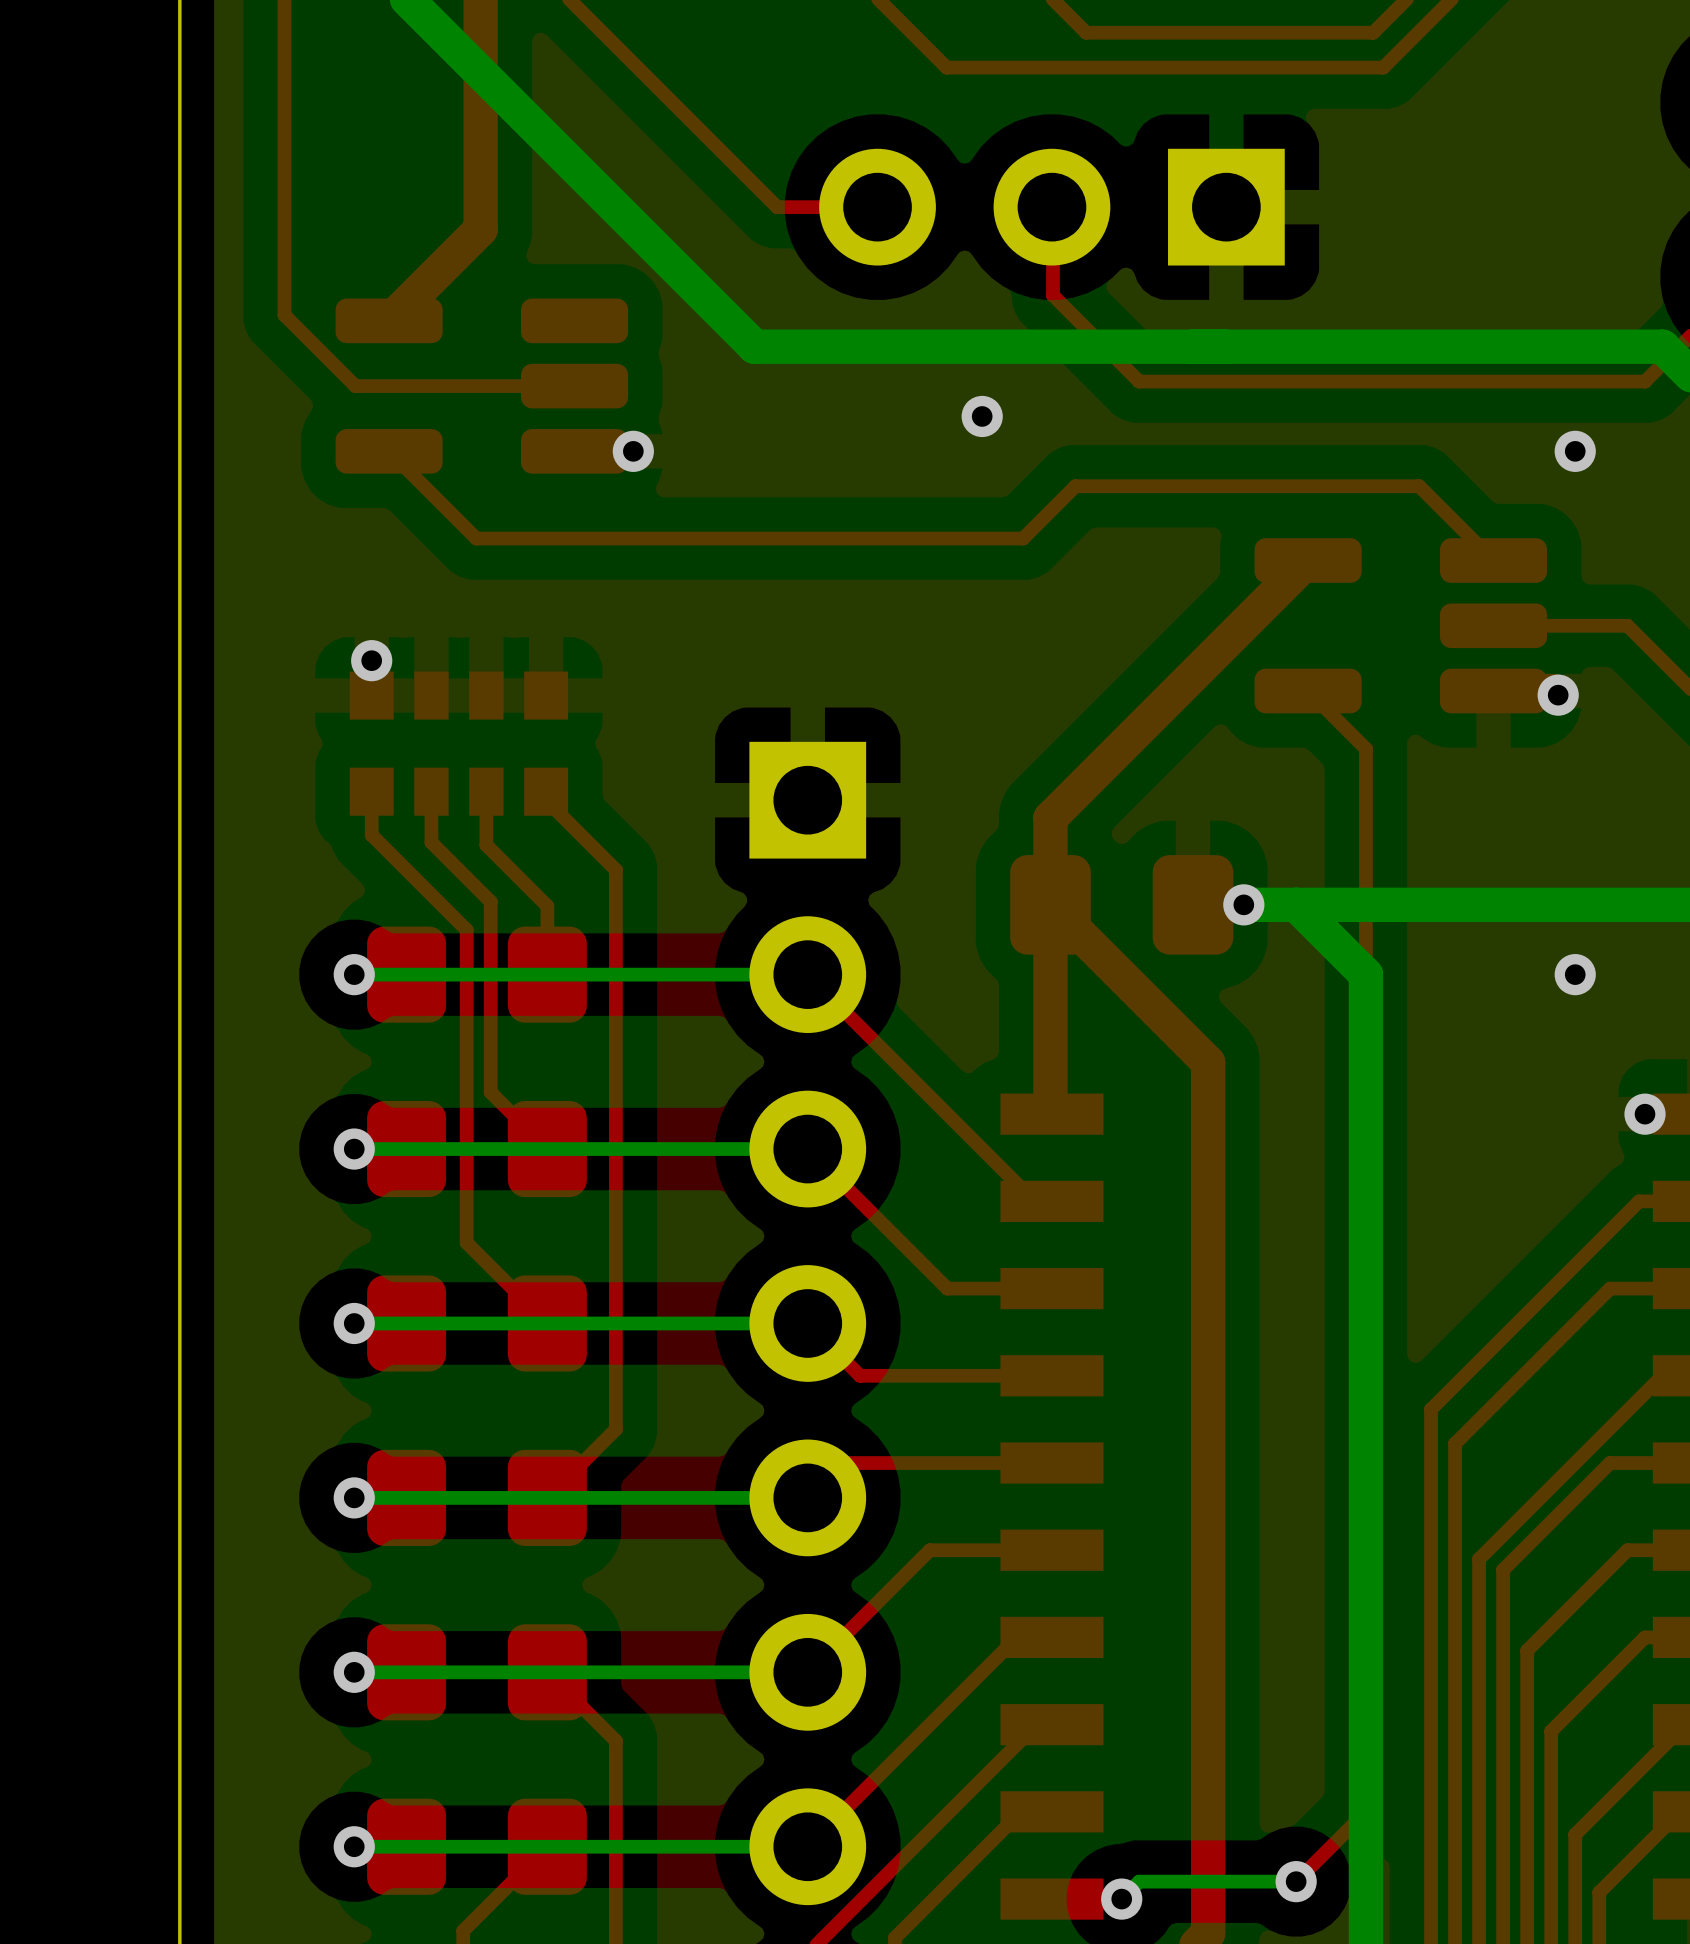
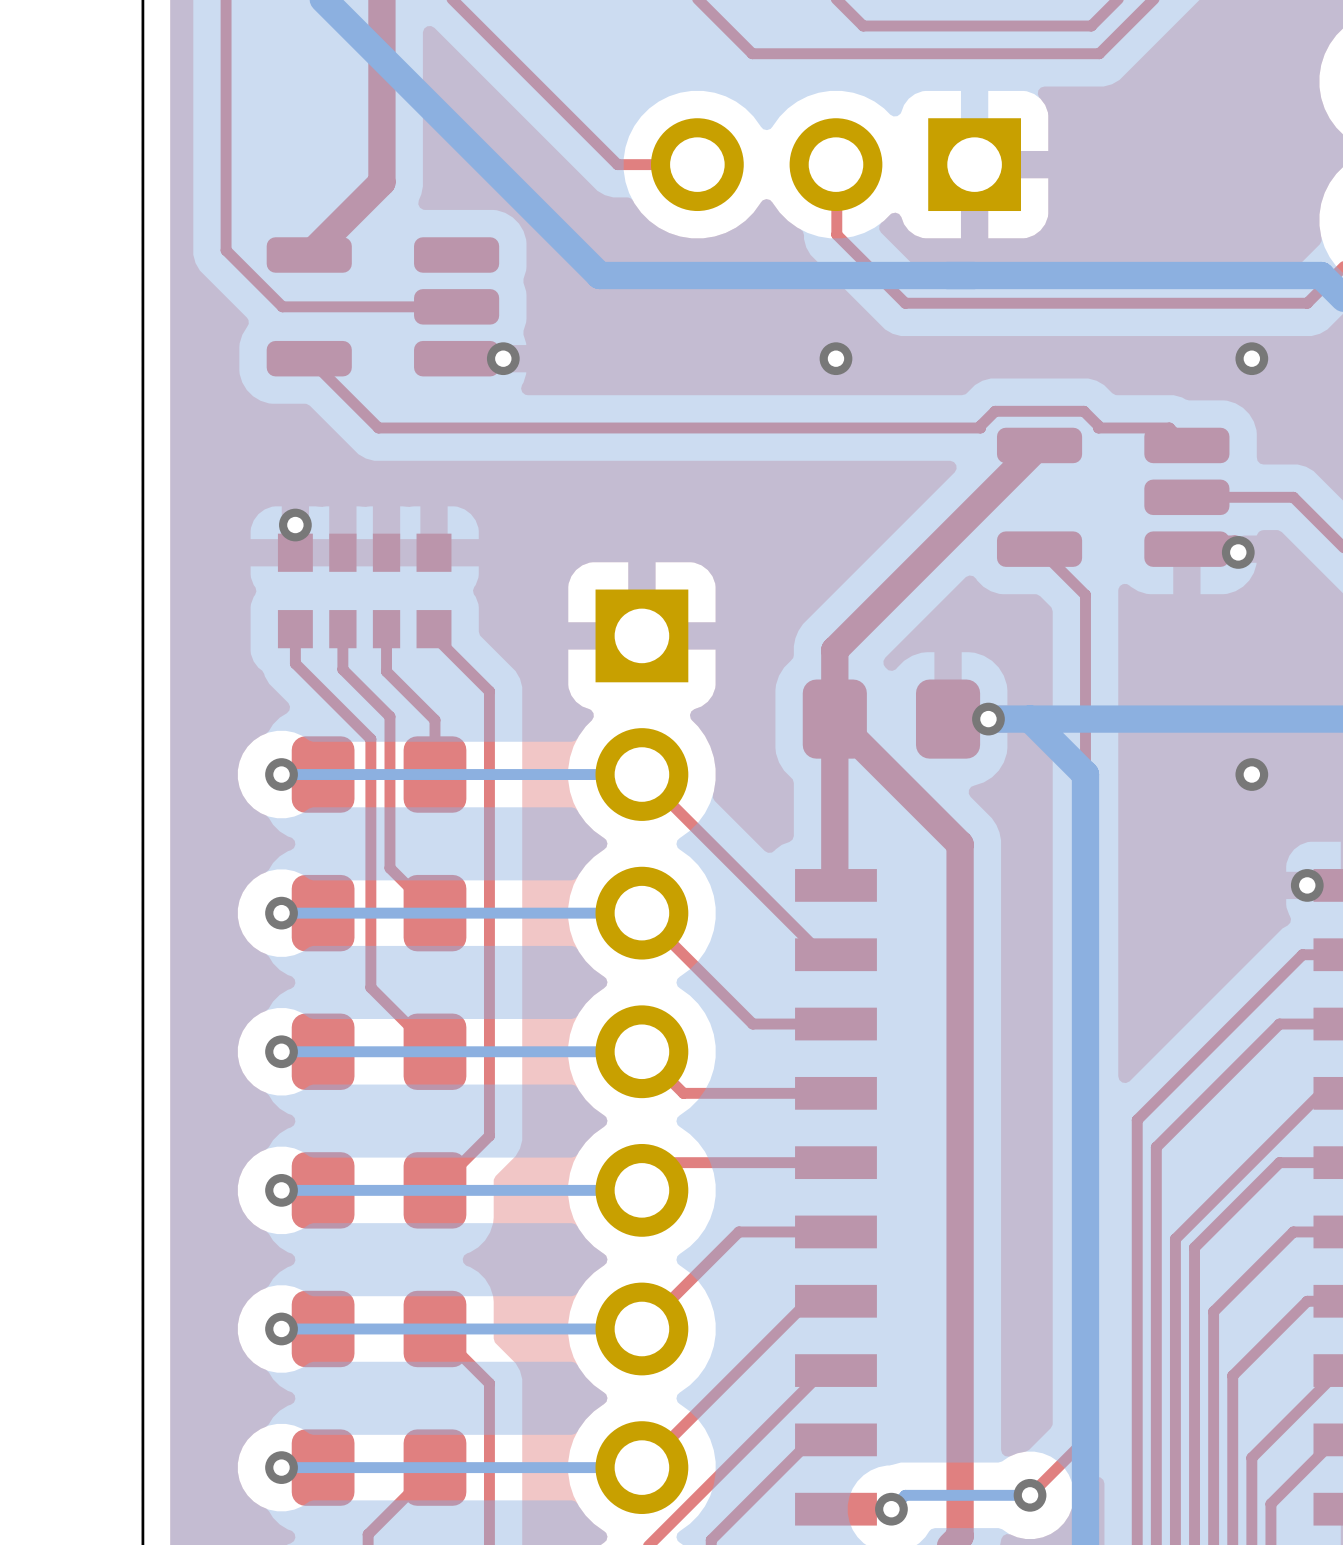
via position: (982, 416) -> (835, 358)
top track: (1471, 538) (1419, 486) (1075, 486) (1023, 538) -> (1169, 427) (1098, 427) (1083, 411) (995, 411) (980, 427) (813, 427)

